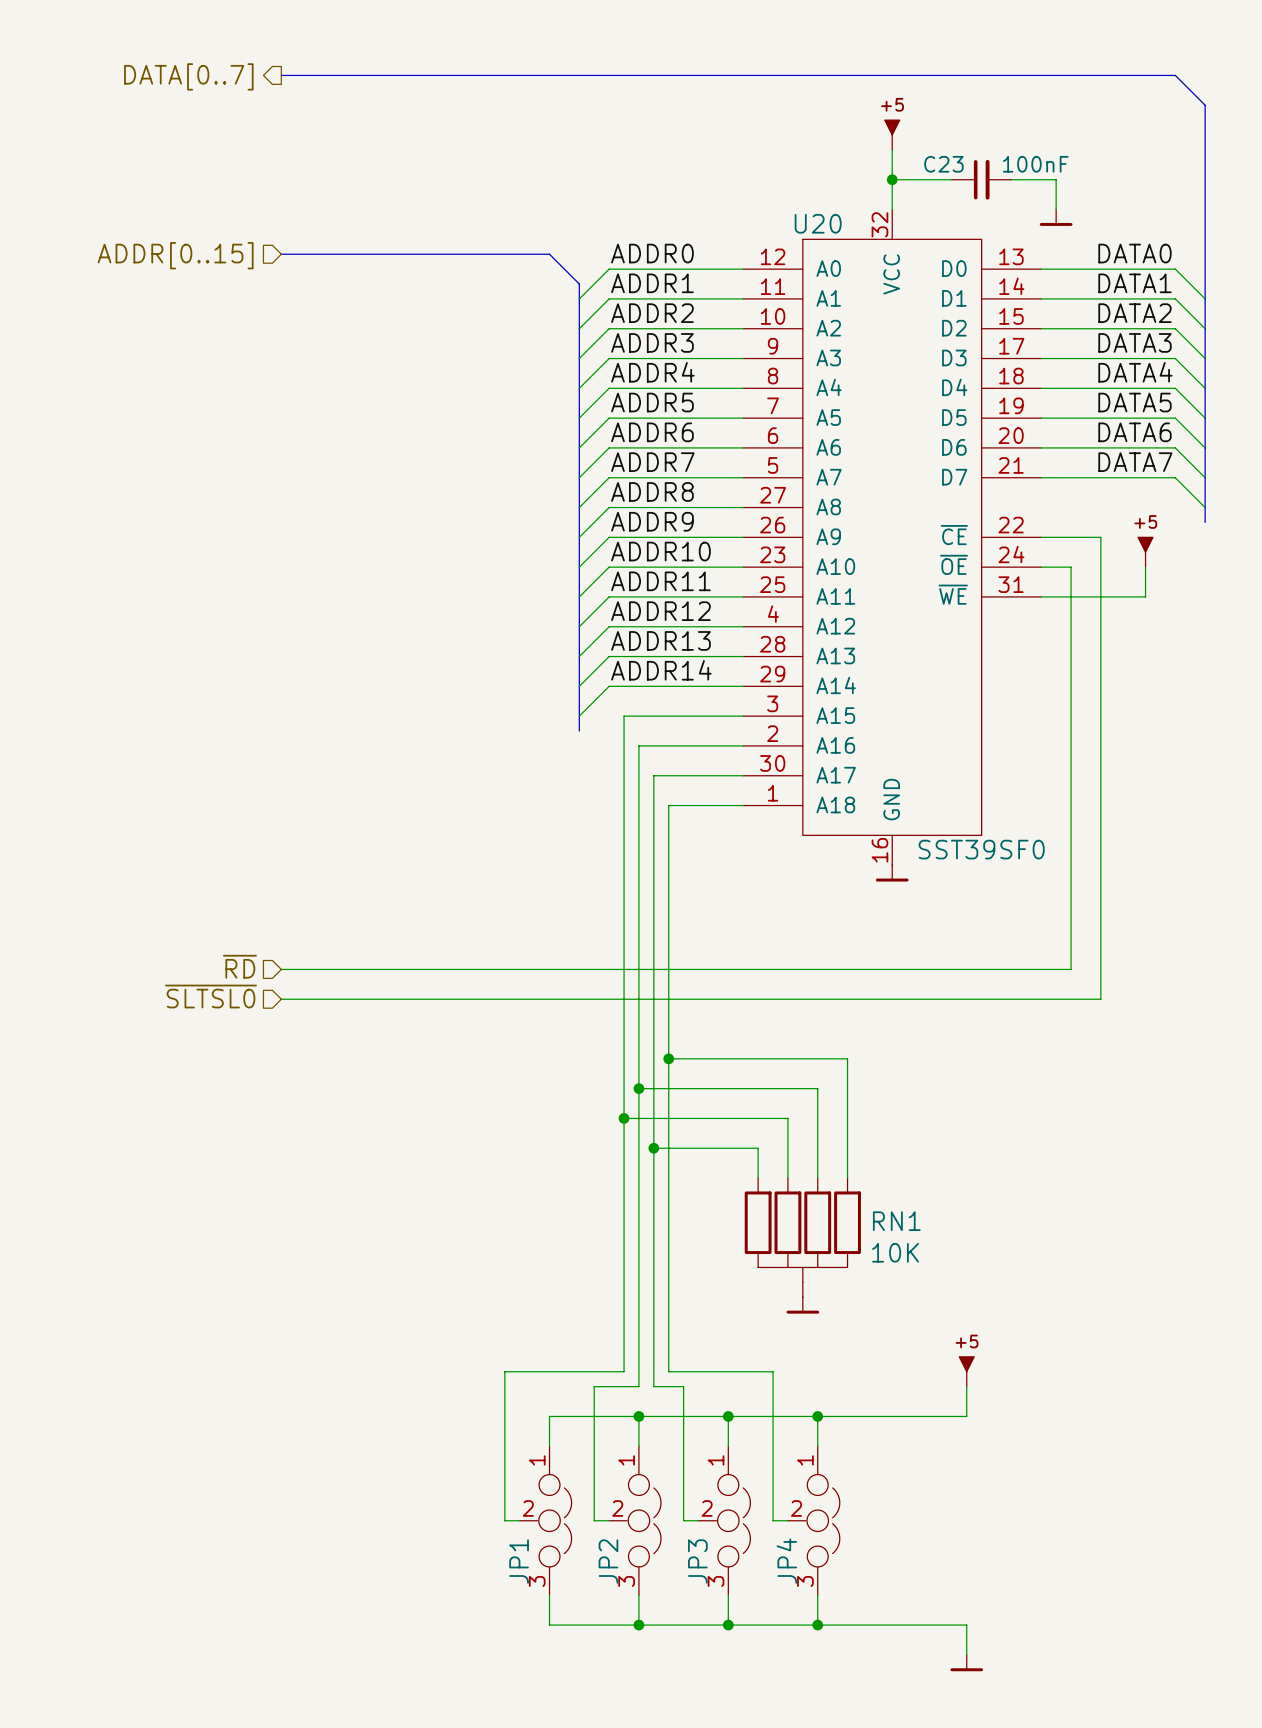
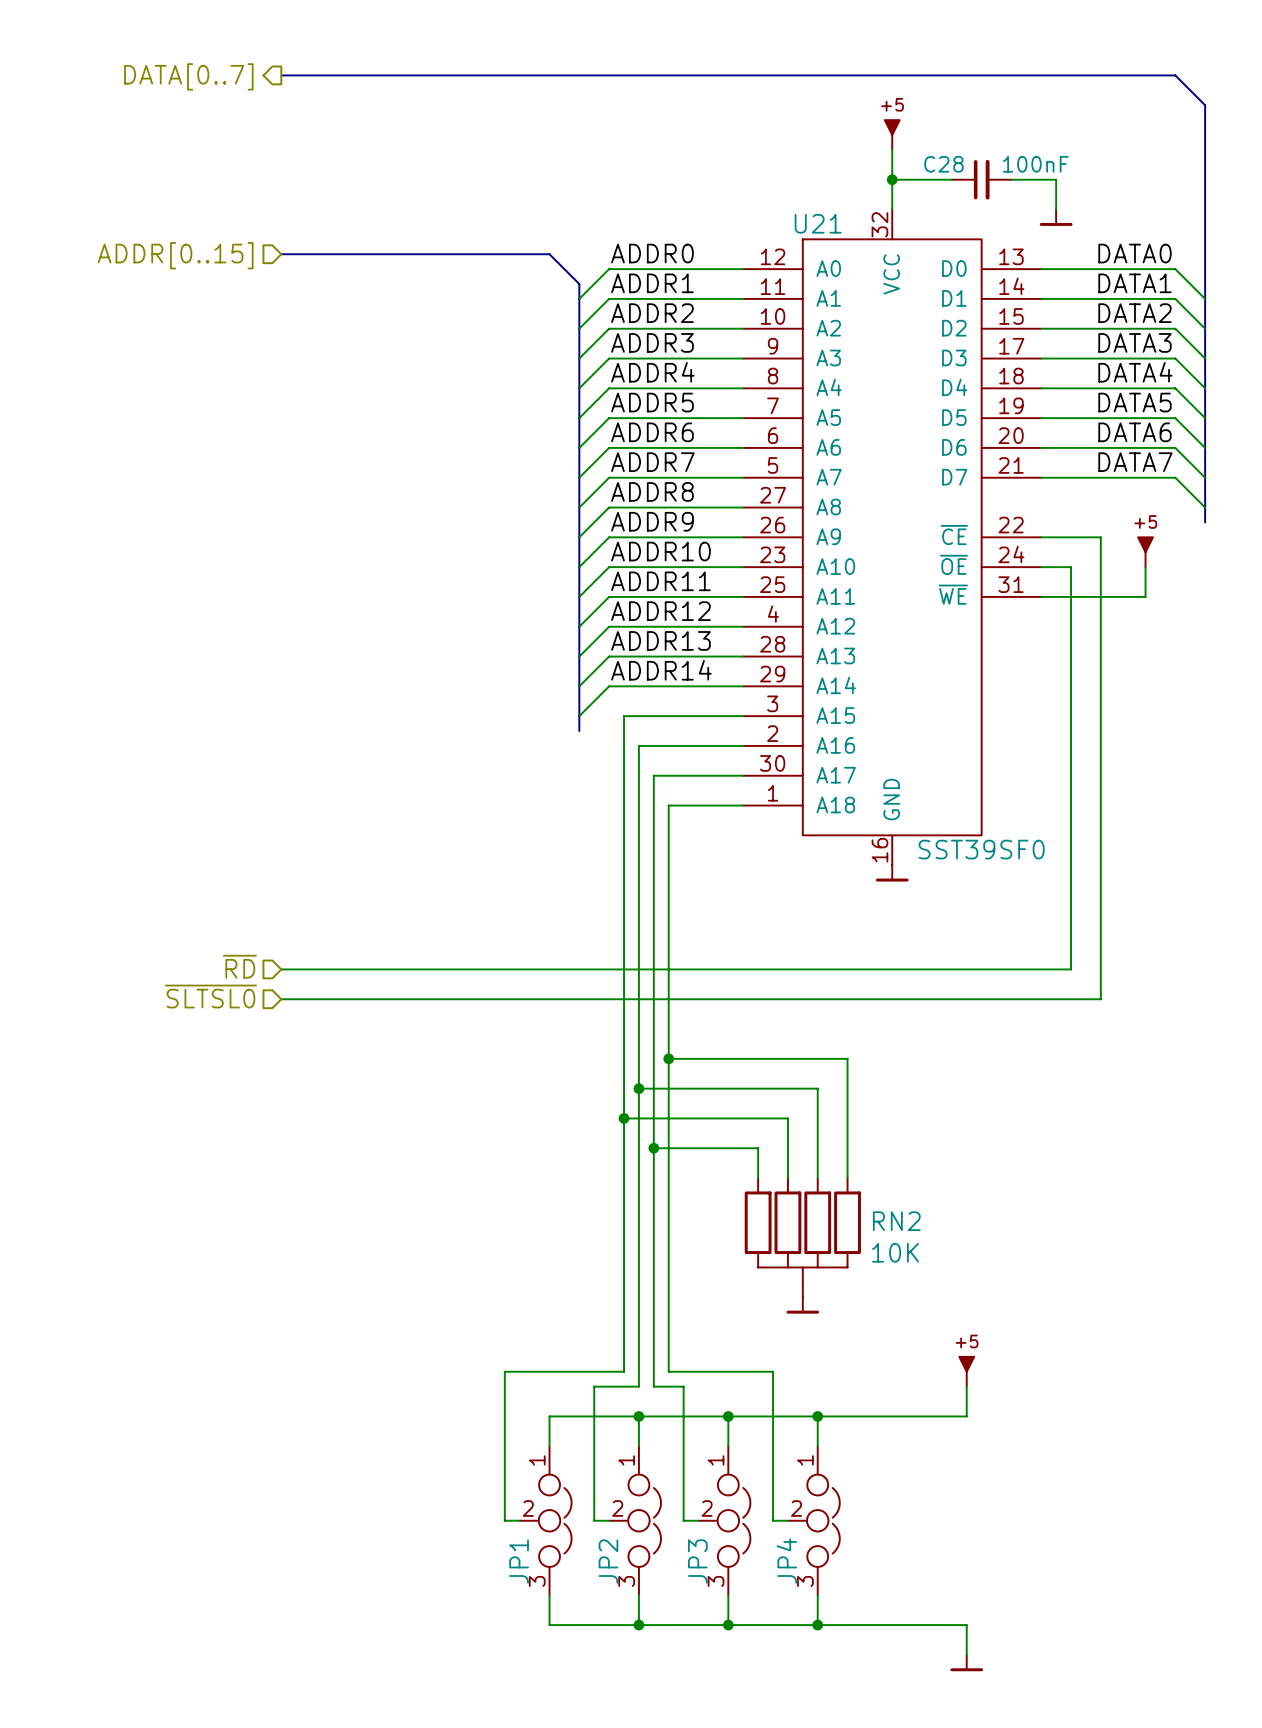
C23 name: C23 (943, 164) -> C28 (943, 164)
U20 name: U20 (818, 223) -> U21 (818, 223)
RN1 name: RN1 (896, 1221) -> RN2 (896, 1221)

